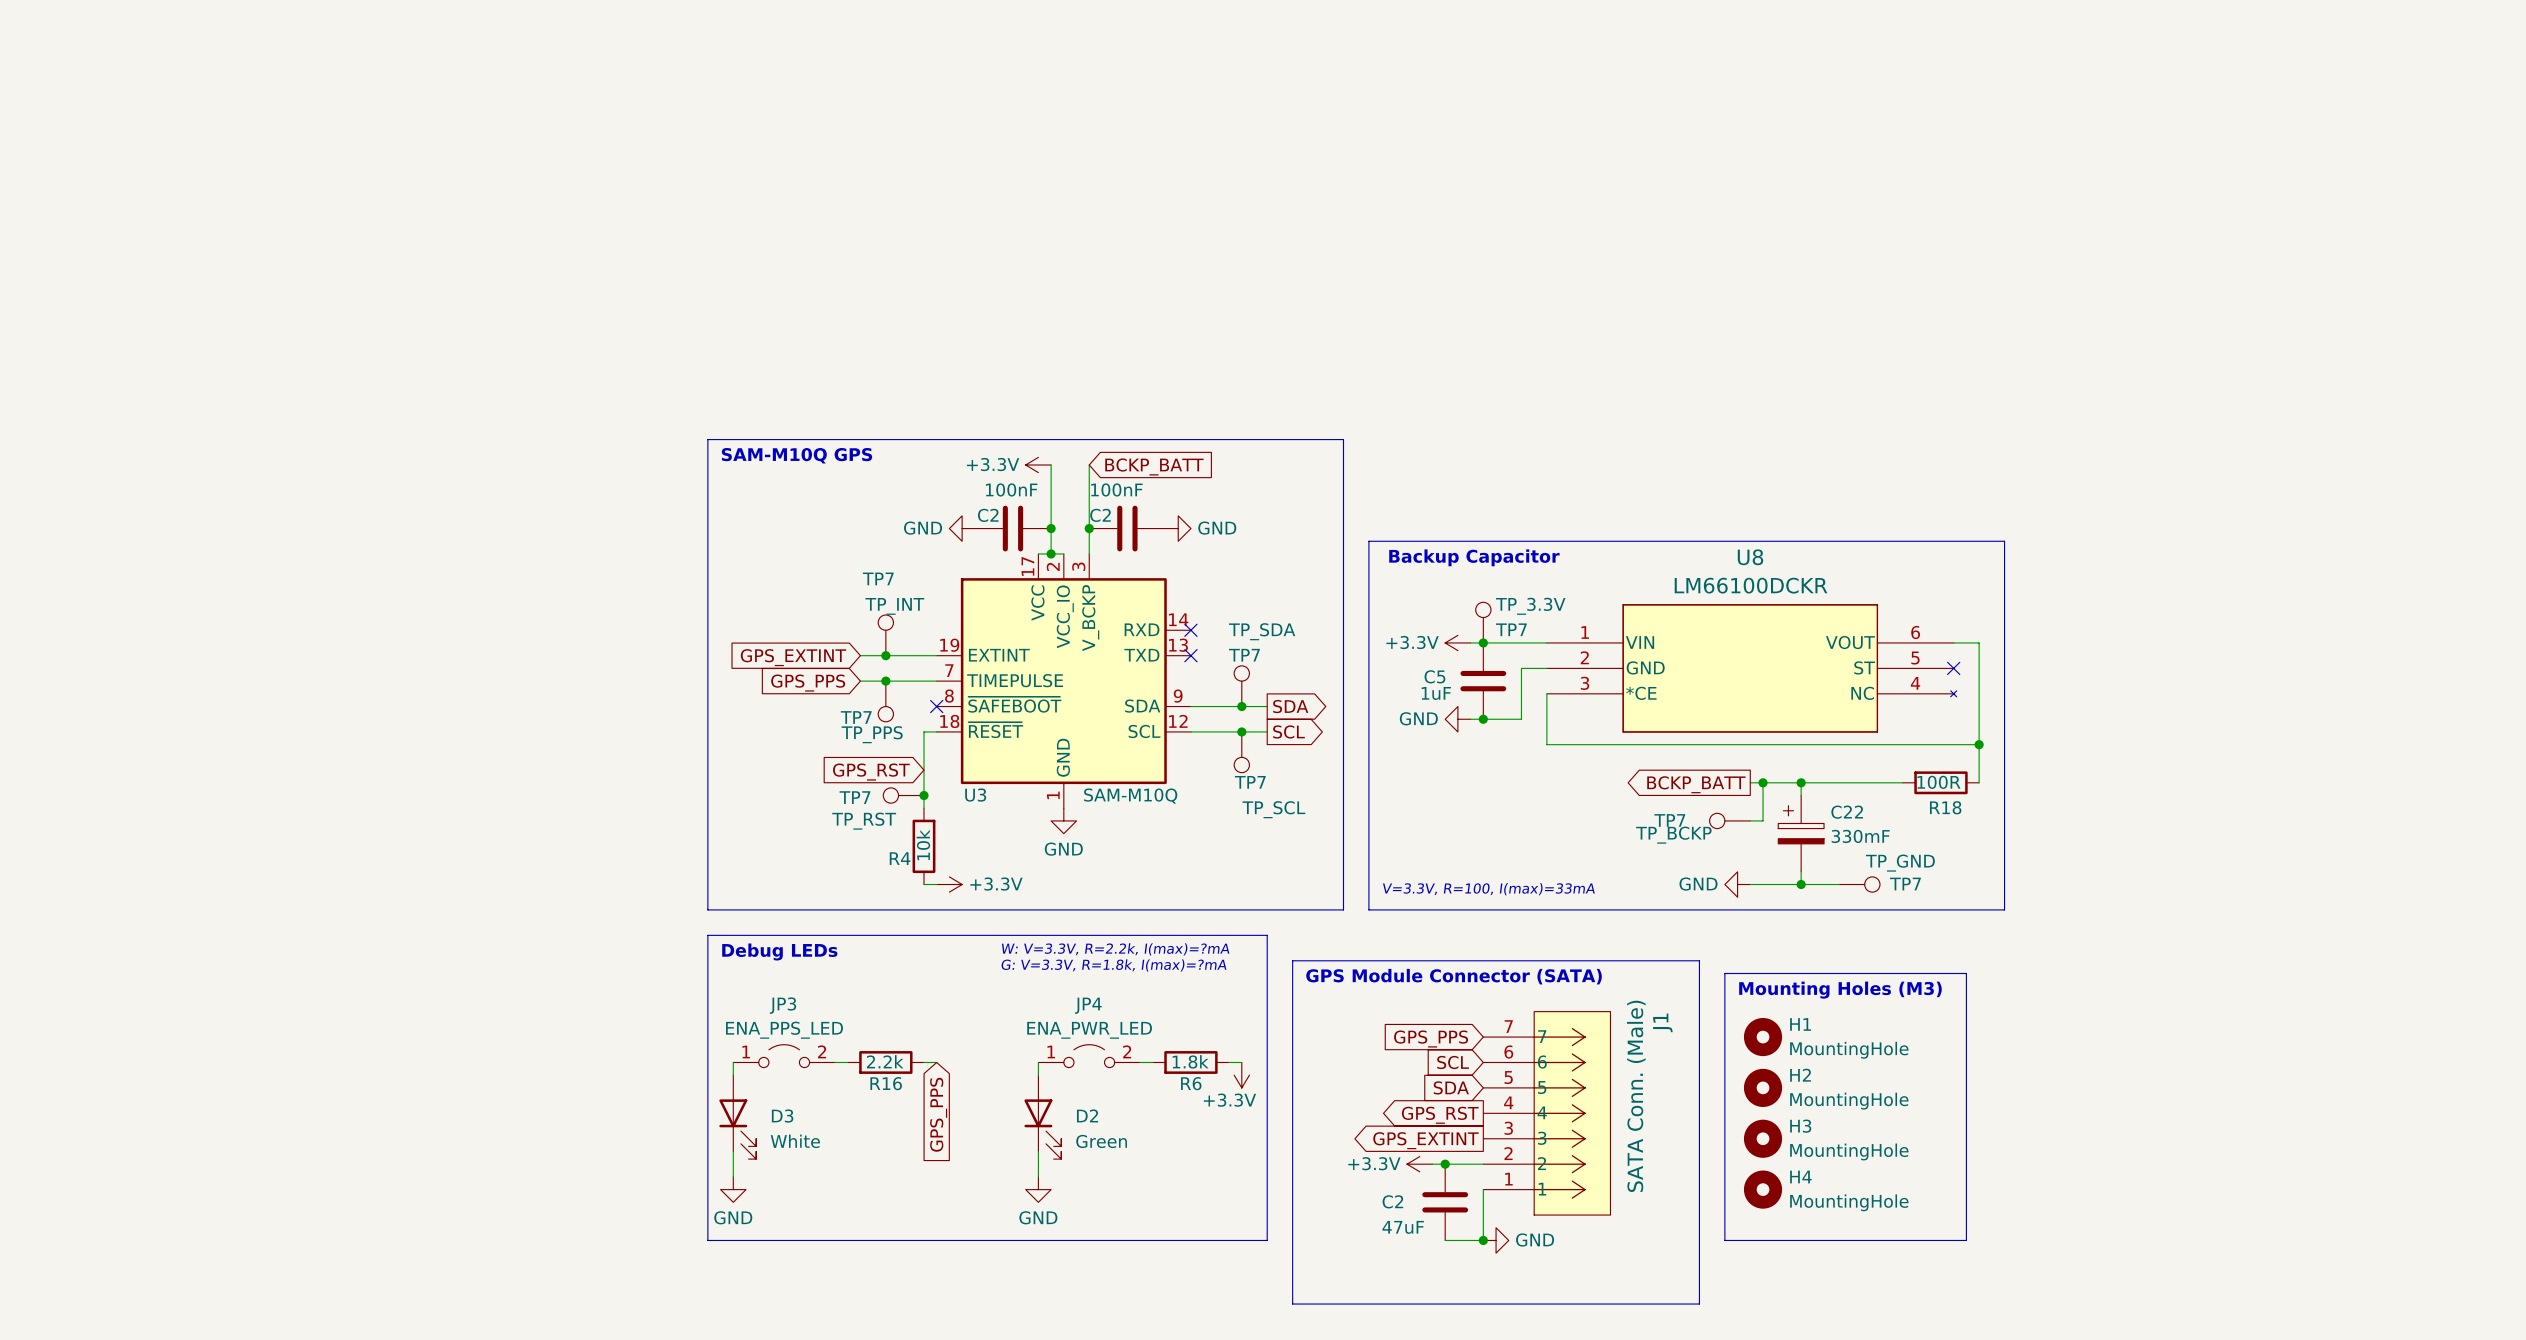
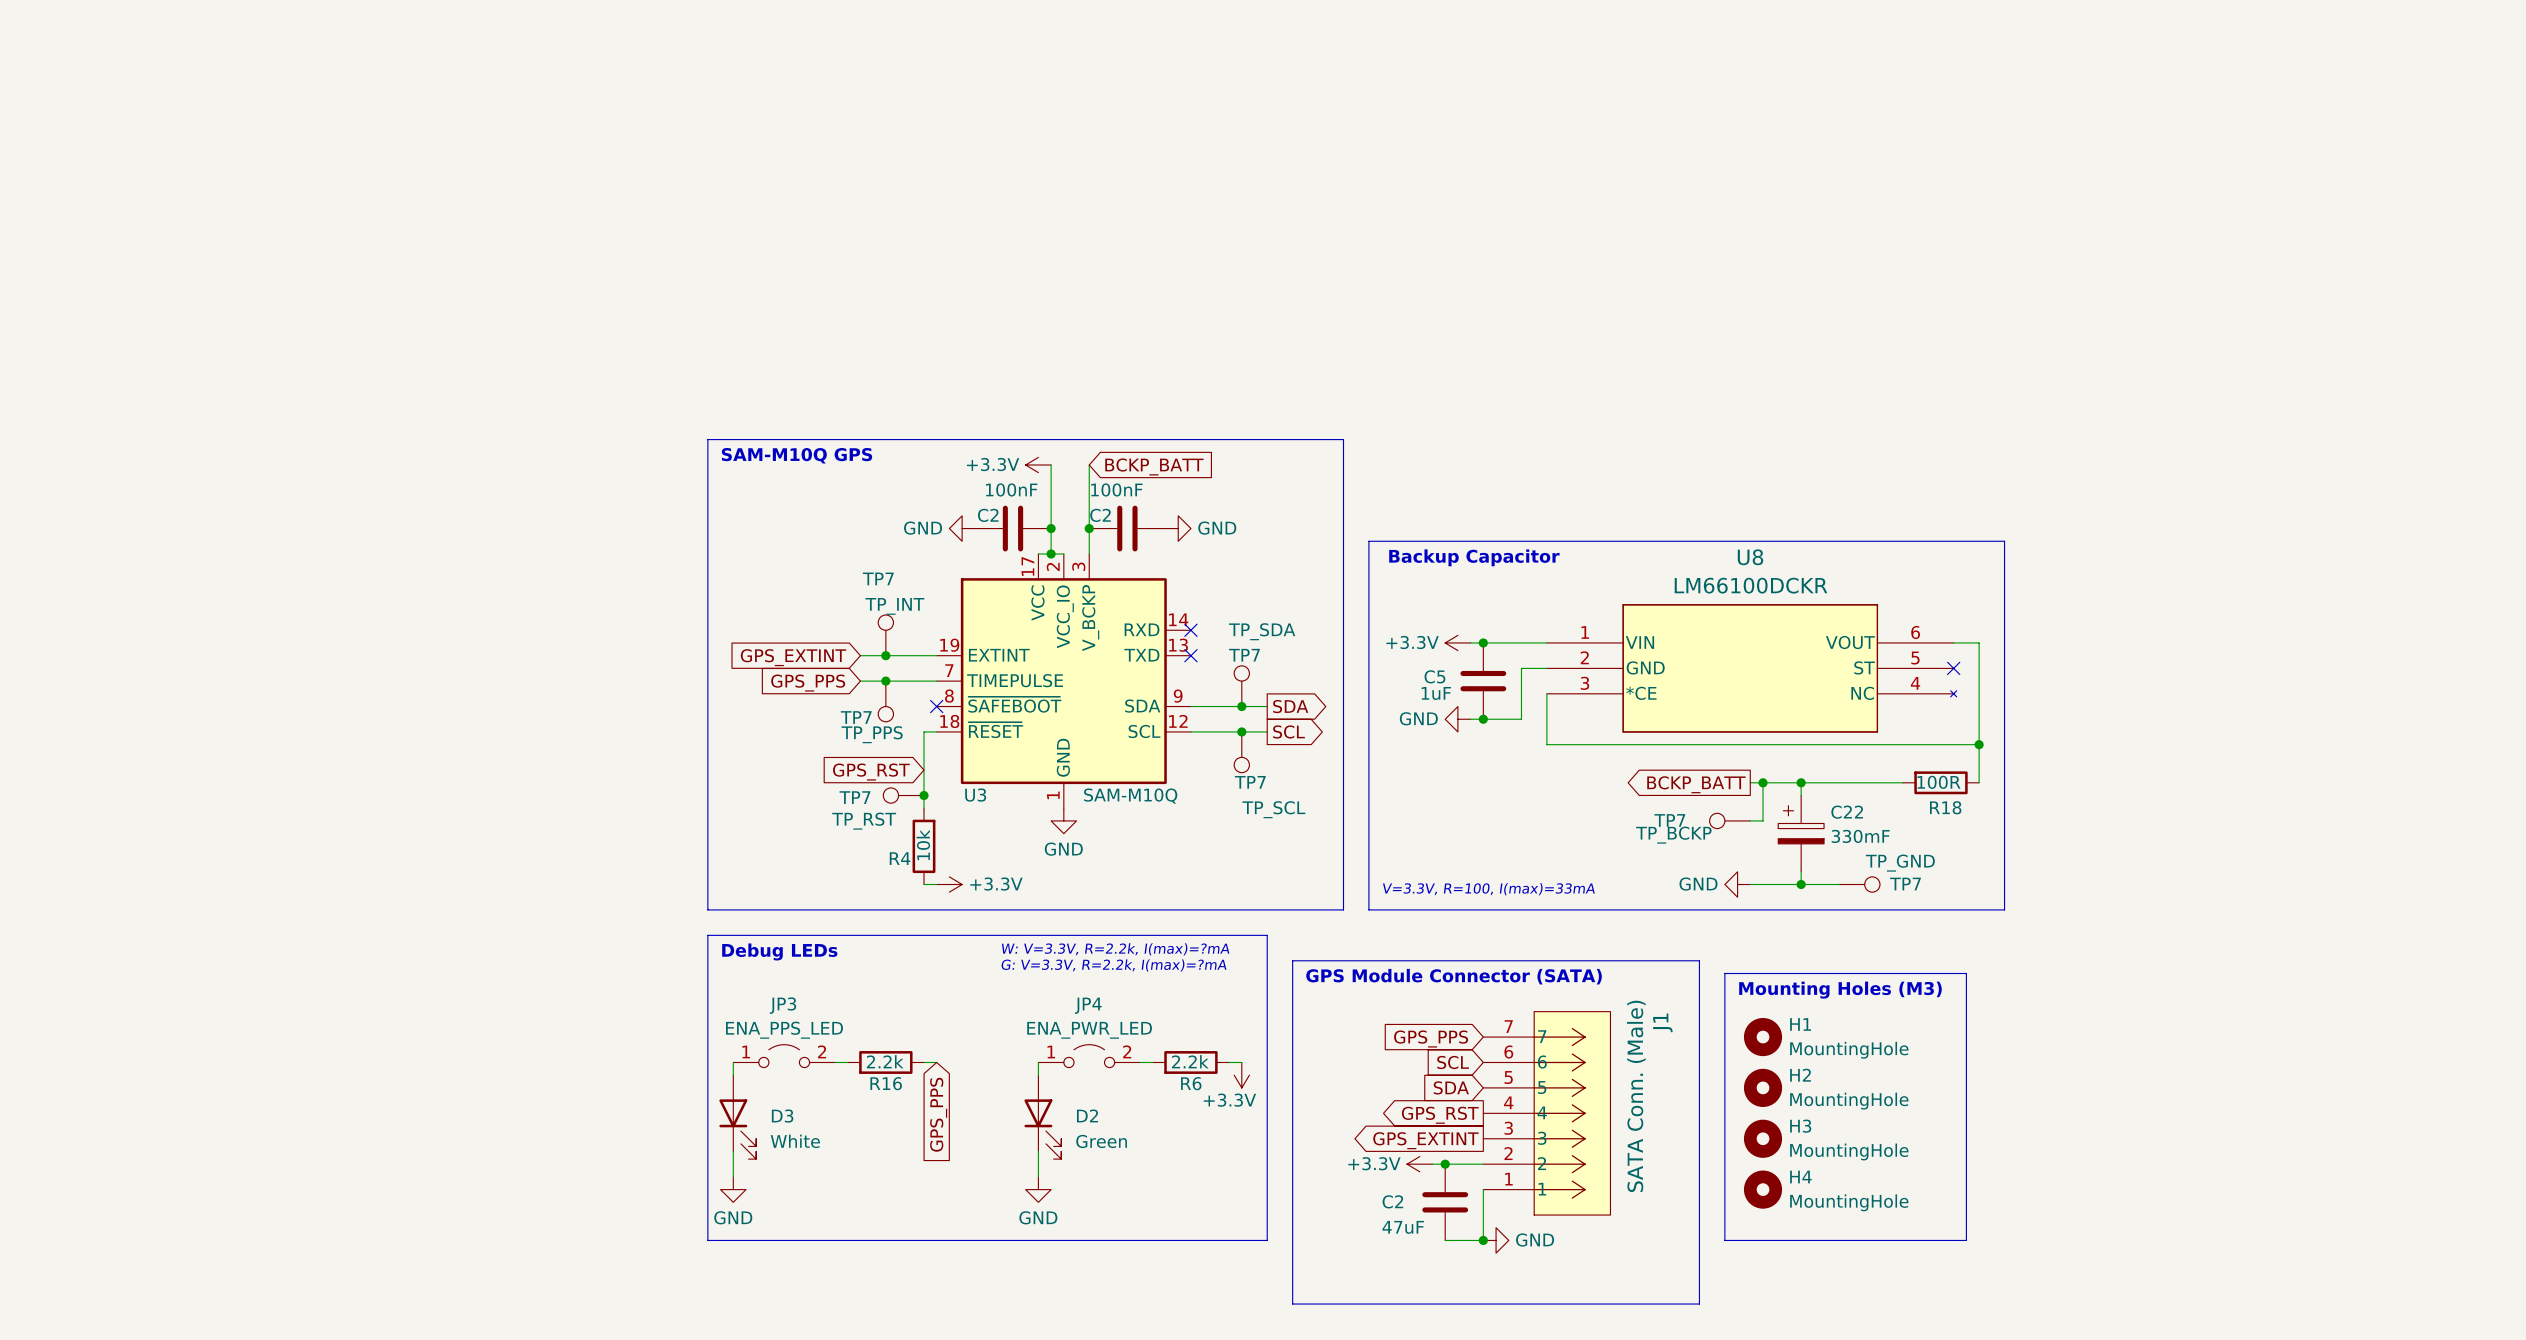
TP7: TP_3.3V (1483, 622) -> none
text: G: V=3.3V, R=1.8k, I(max)=?mA (1113, 965) -> G: V=3.3V, R=2.2k, I(max)=?mA (1113, 965)
R6 value: 1.8k (1190, 1061) -> 2.2k (1190, 1061)

